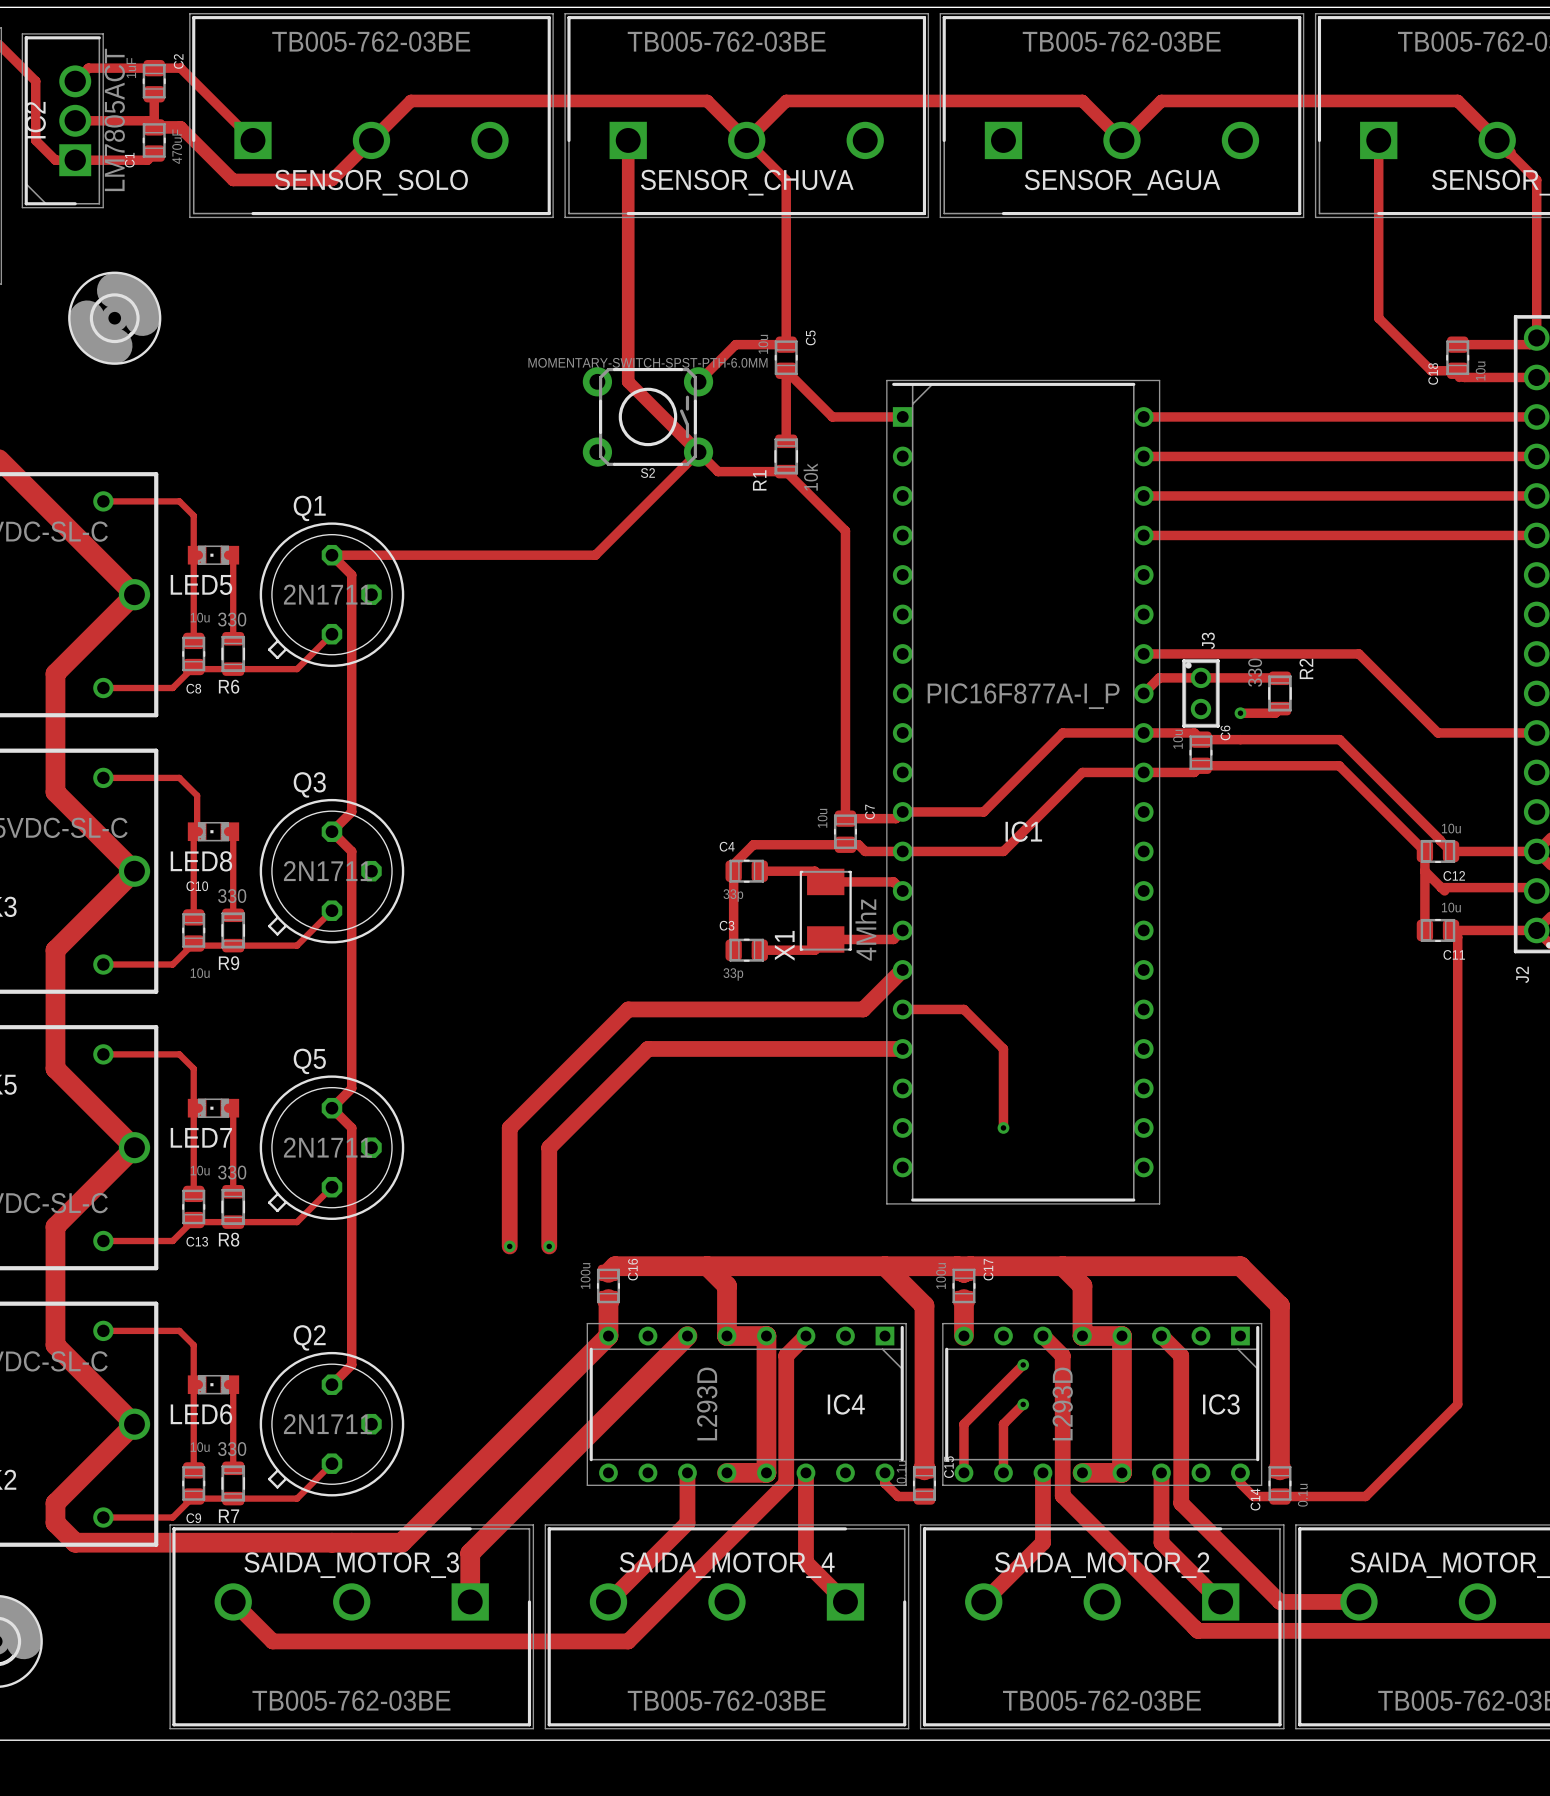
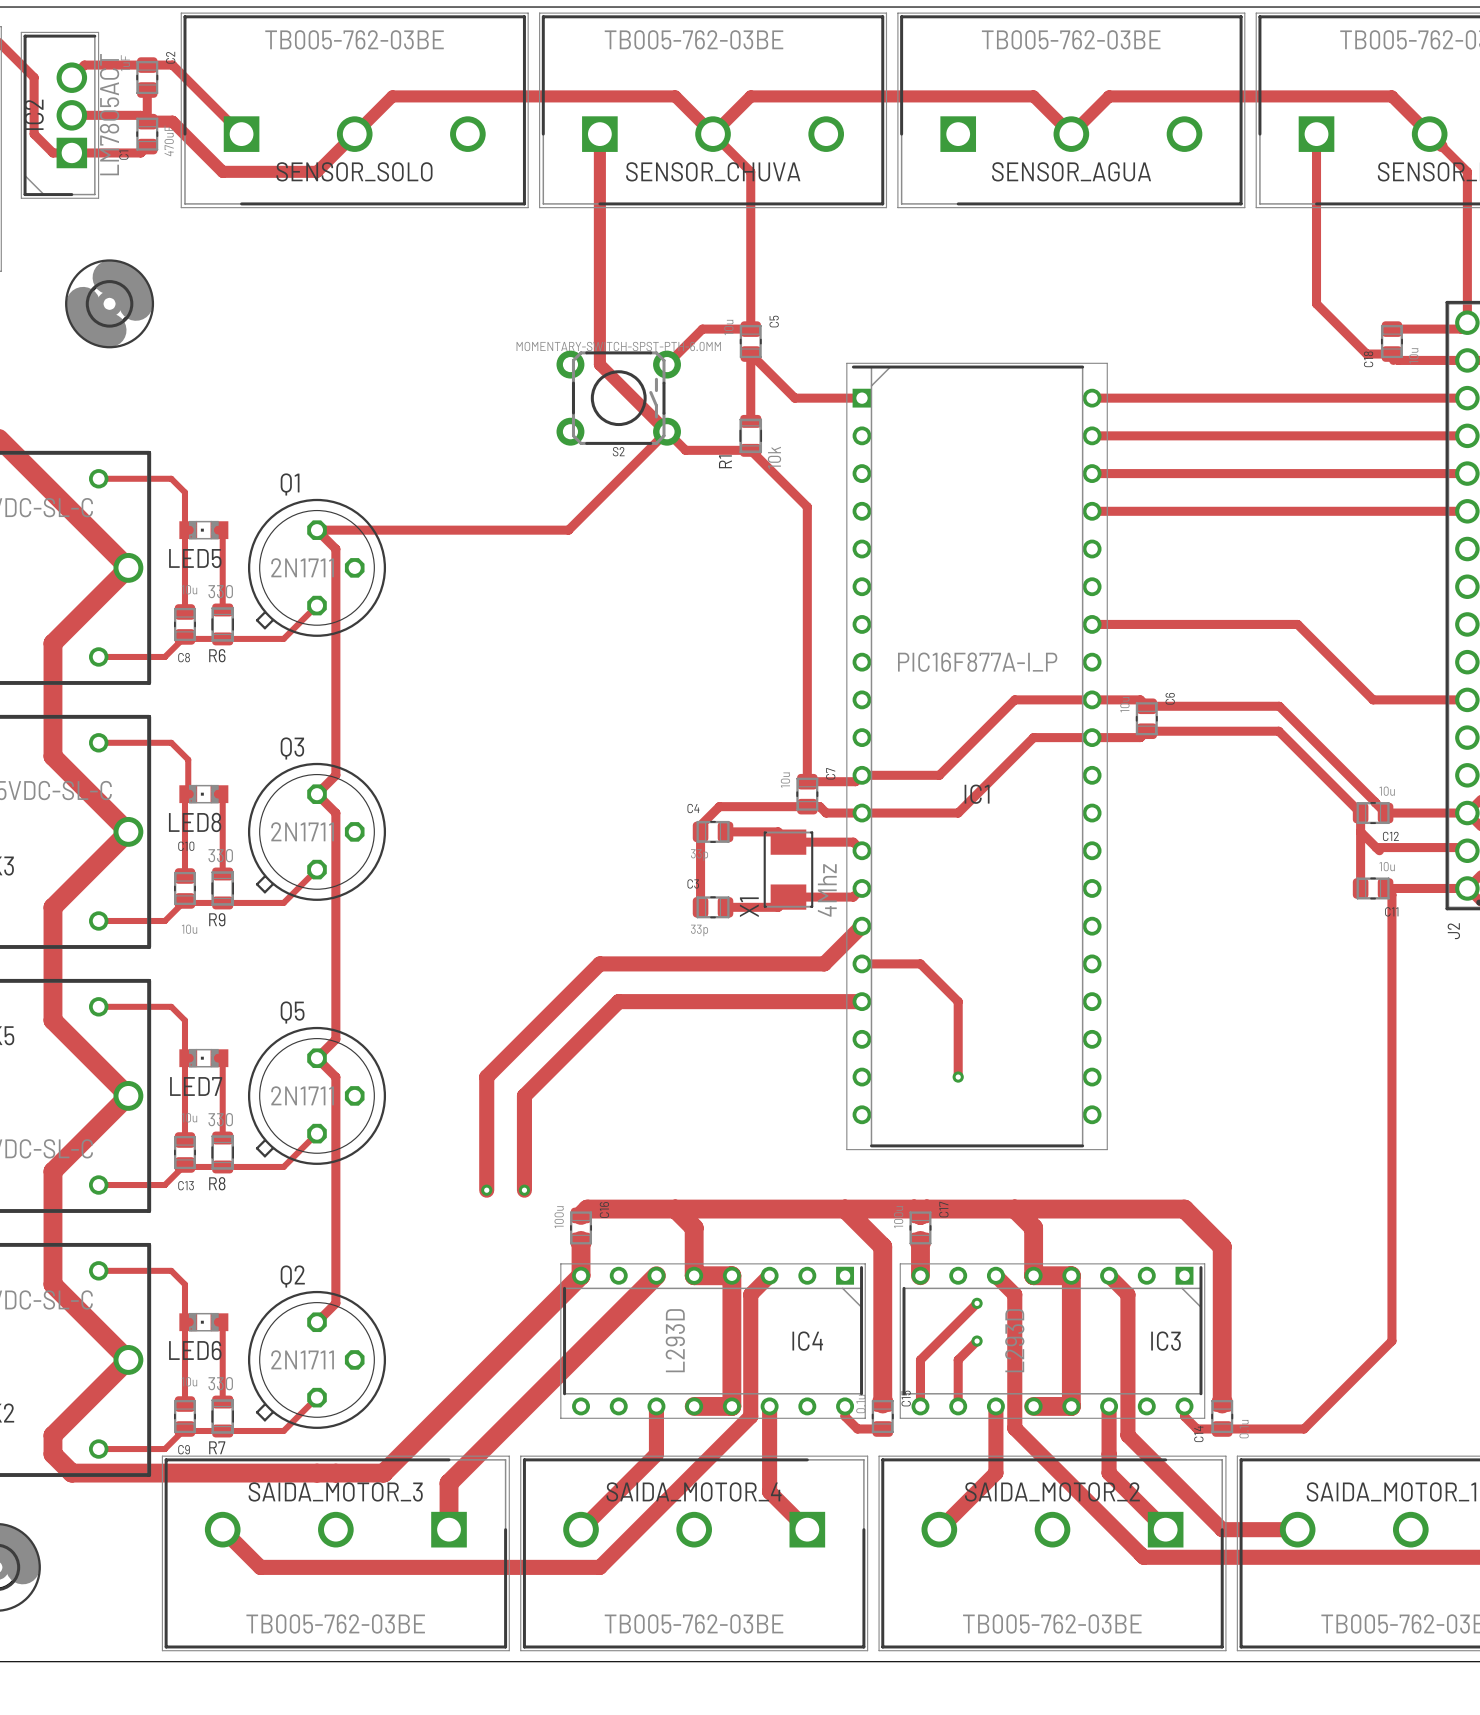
track: (1279, 678) (1159, 677) (1143, 693) -> none
J3: (1200, 693) -> none
R2: 330 (1279, 693) -> none
track: (1279, 708) (1275, 713) (1240, 713) -> none
via: (1240, 713) -> none

